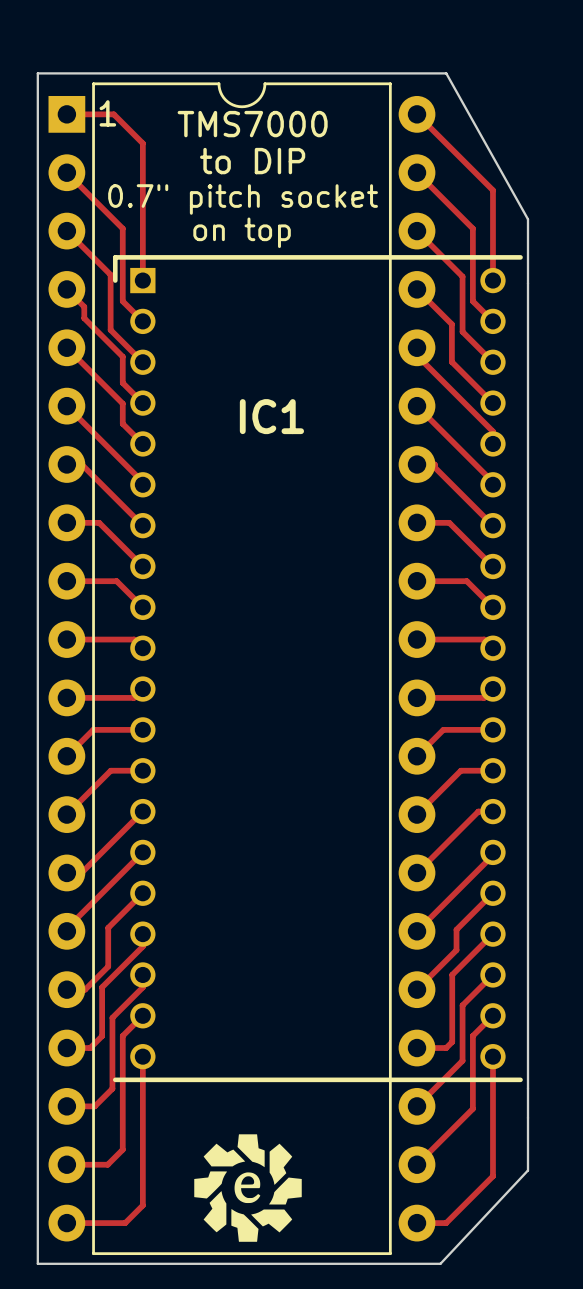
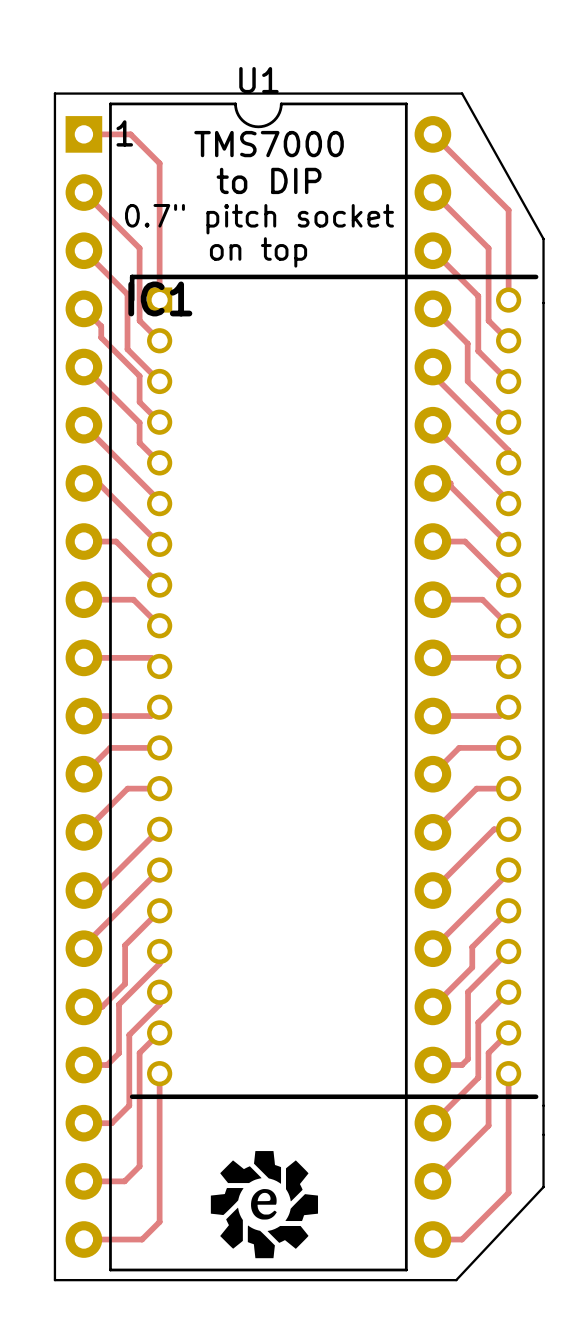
U1 name: none -> U1 (258, 80)
IC1 name position: IC1 (271, 416) -> IC1 (160, 298)

